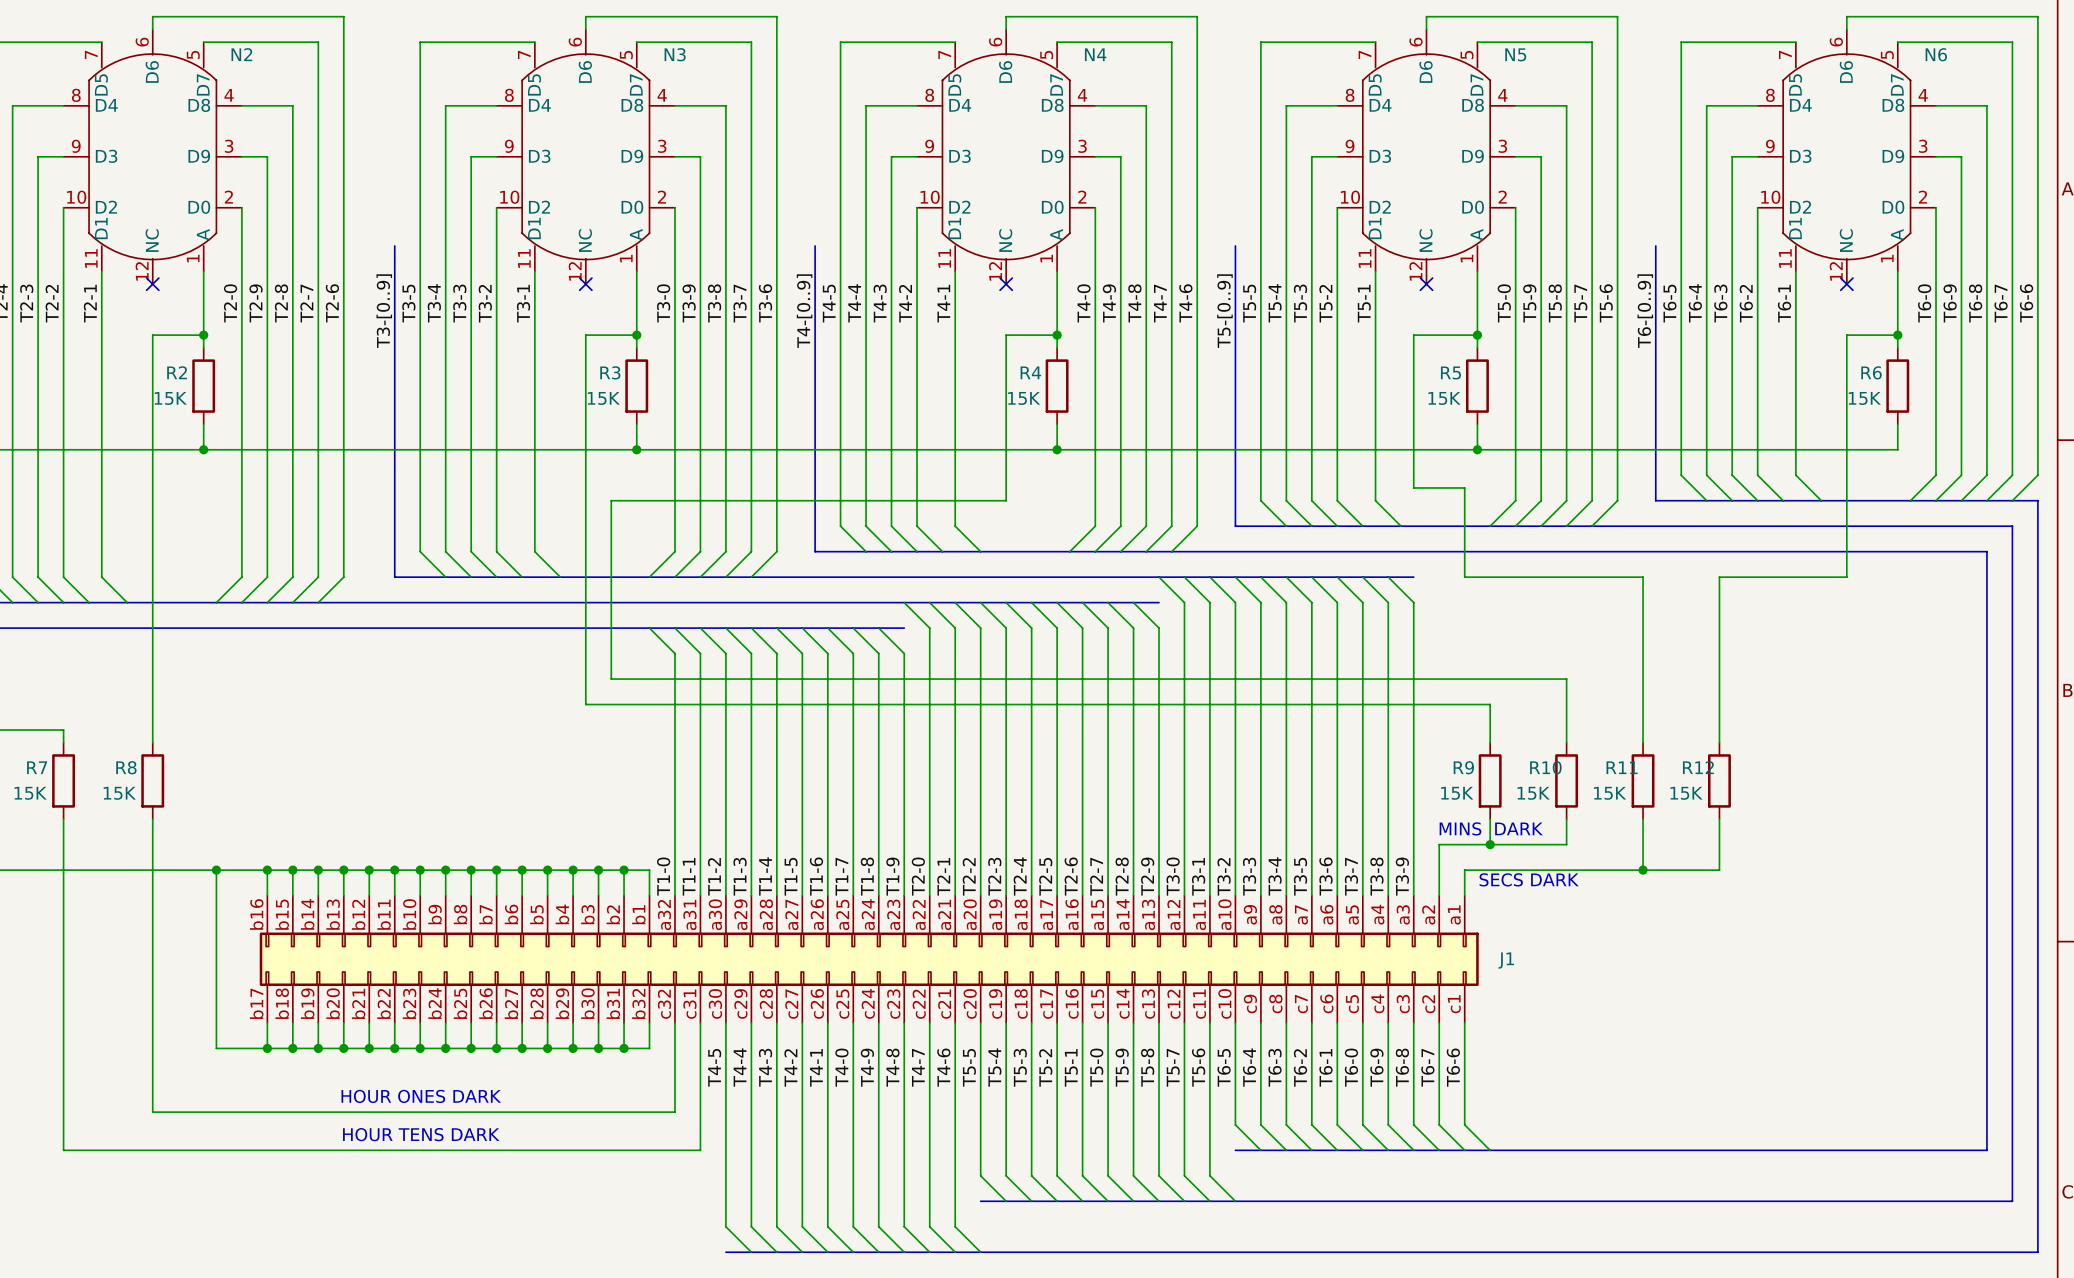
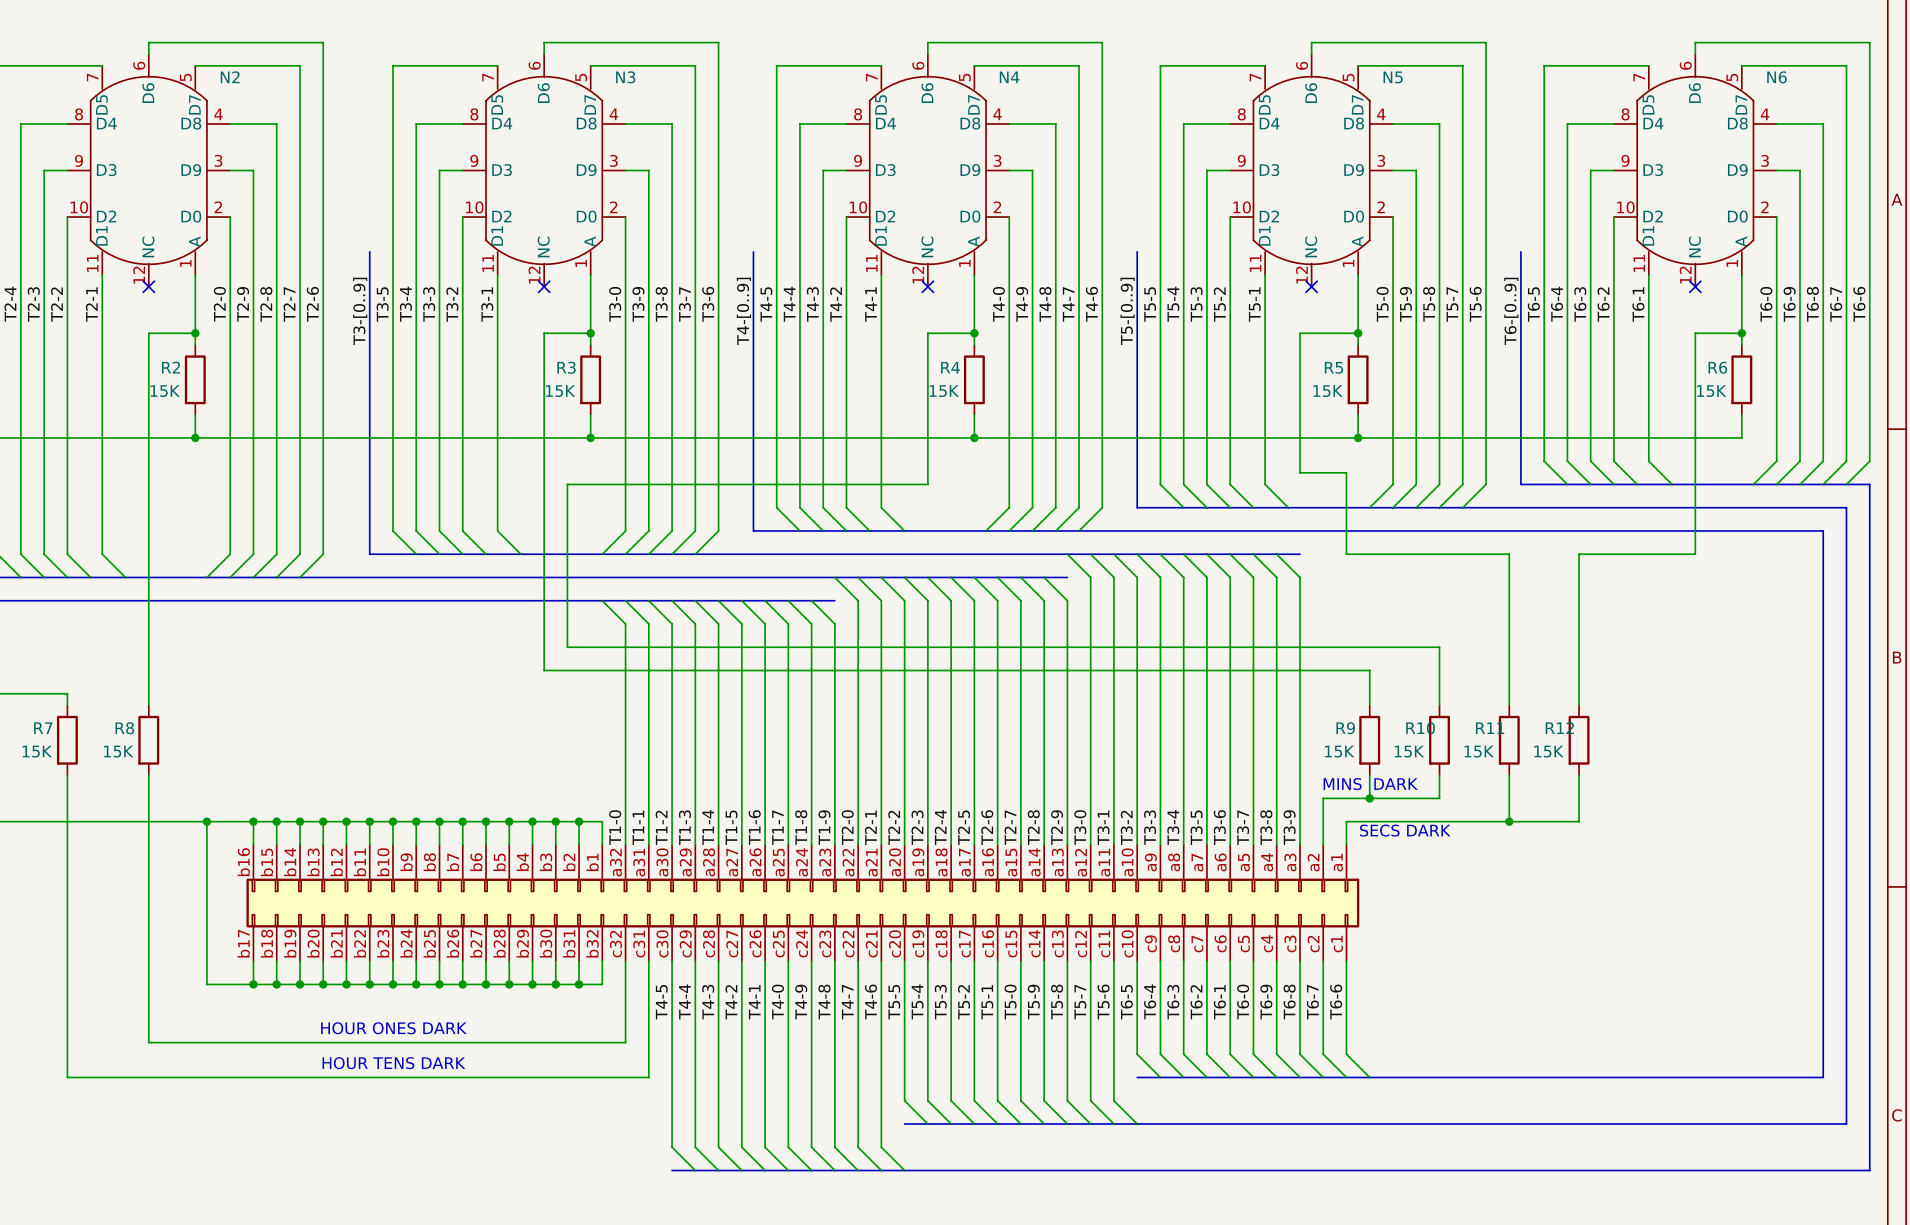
J1 name: J1 (1506, 960) -> none

